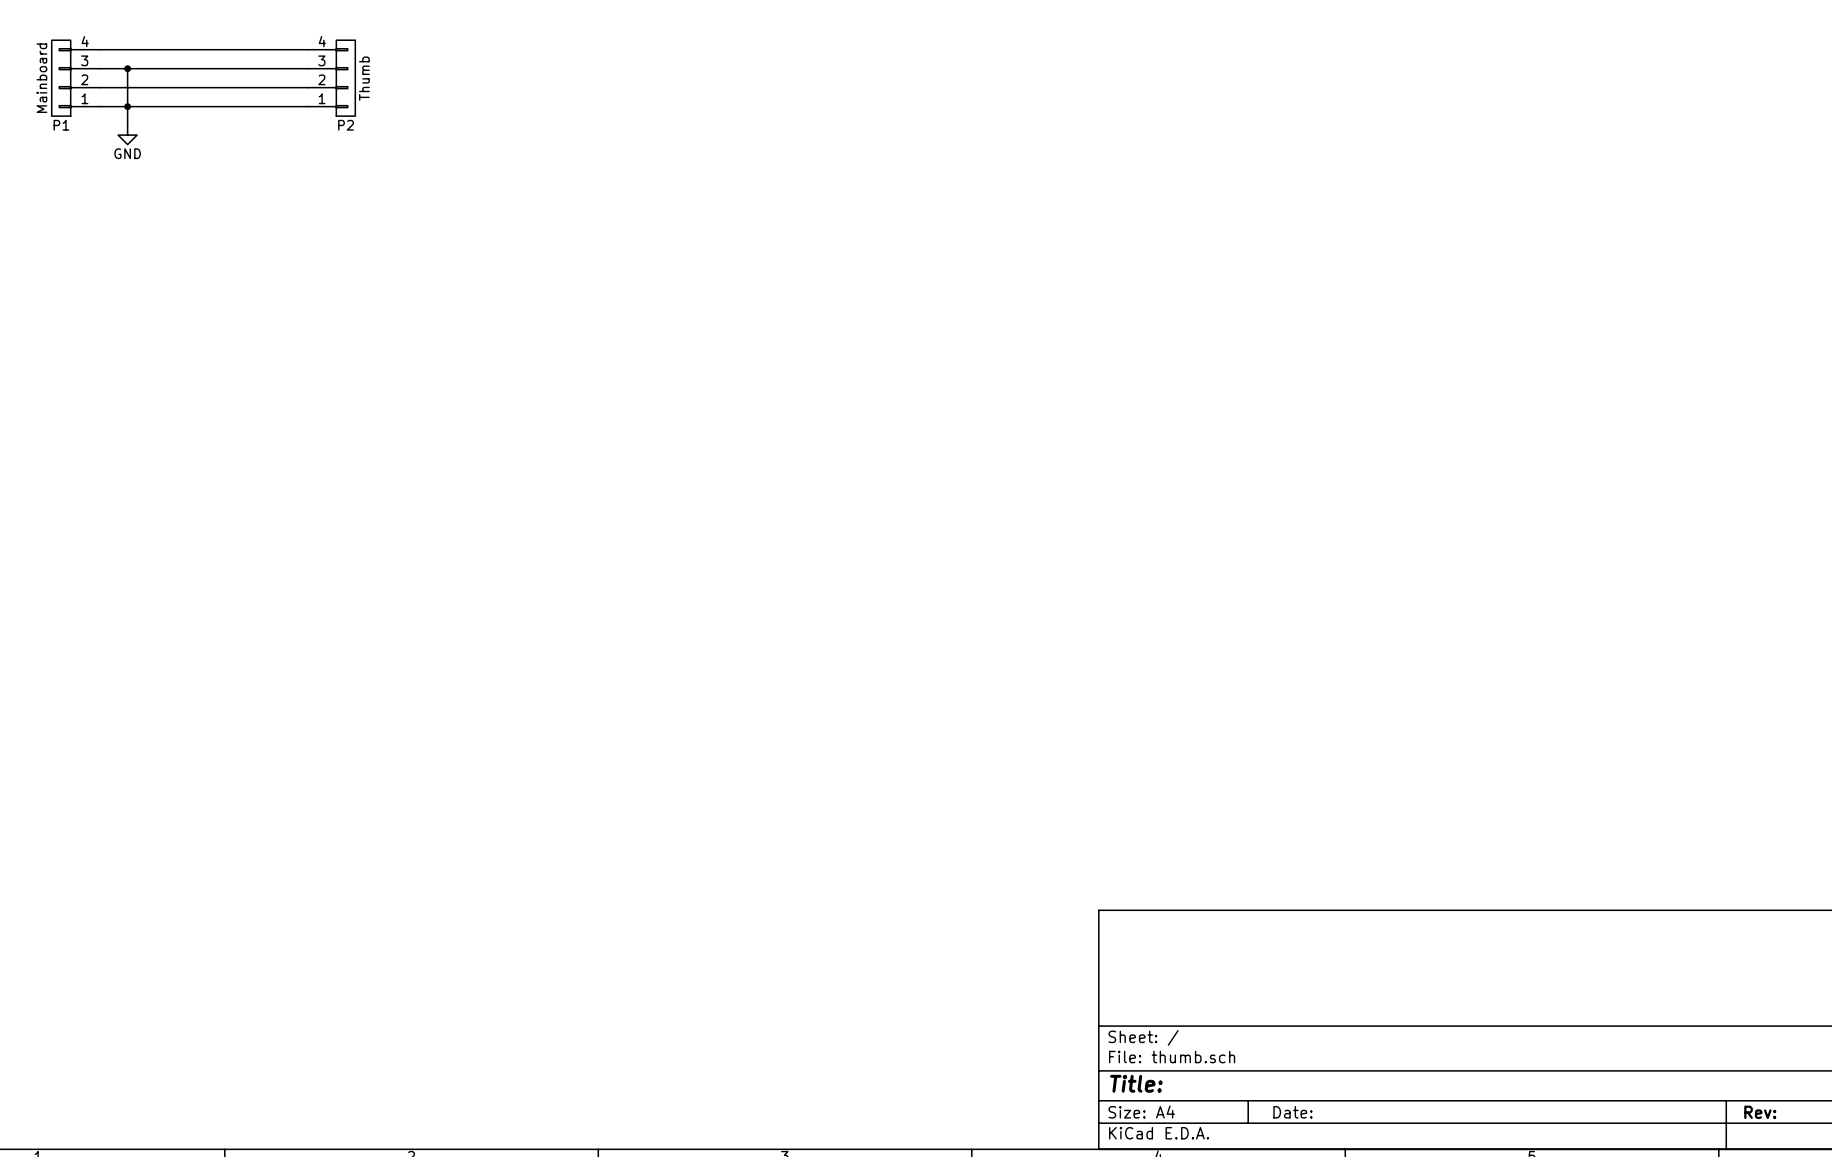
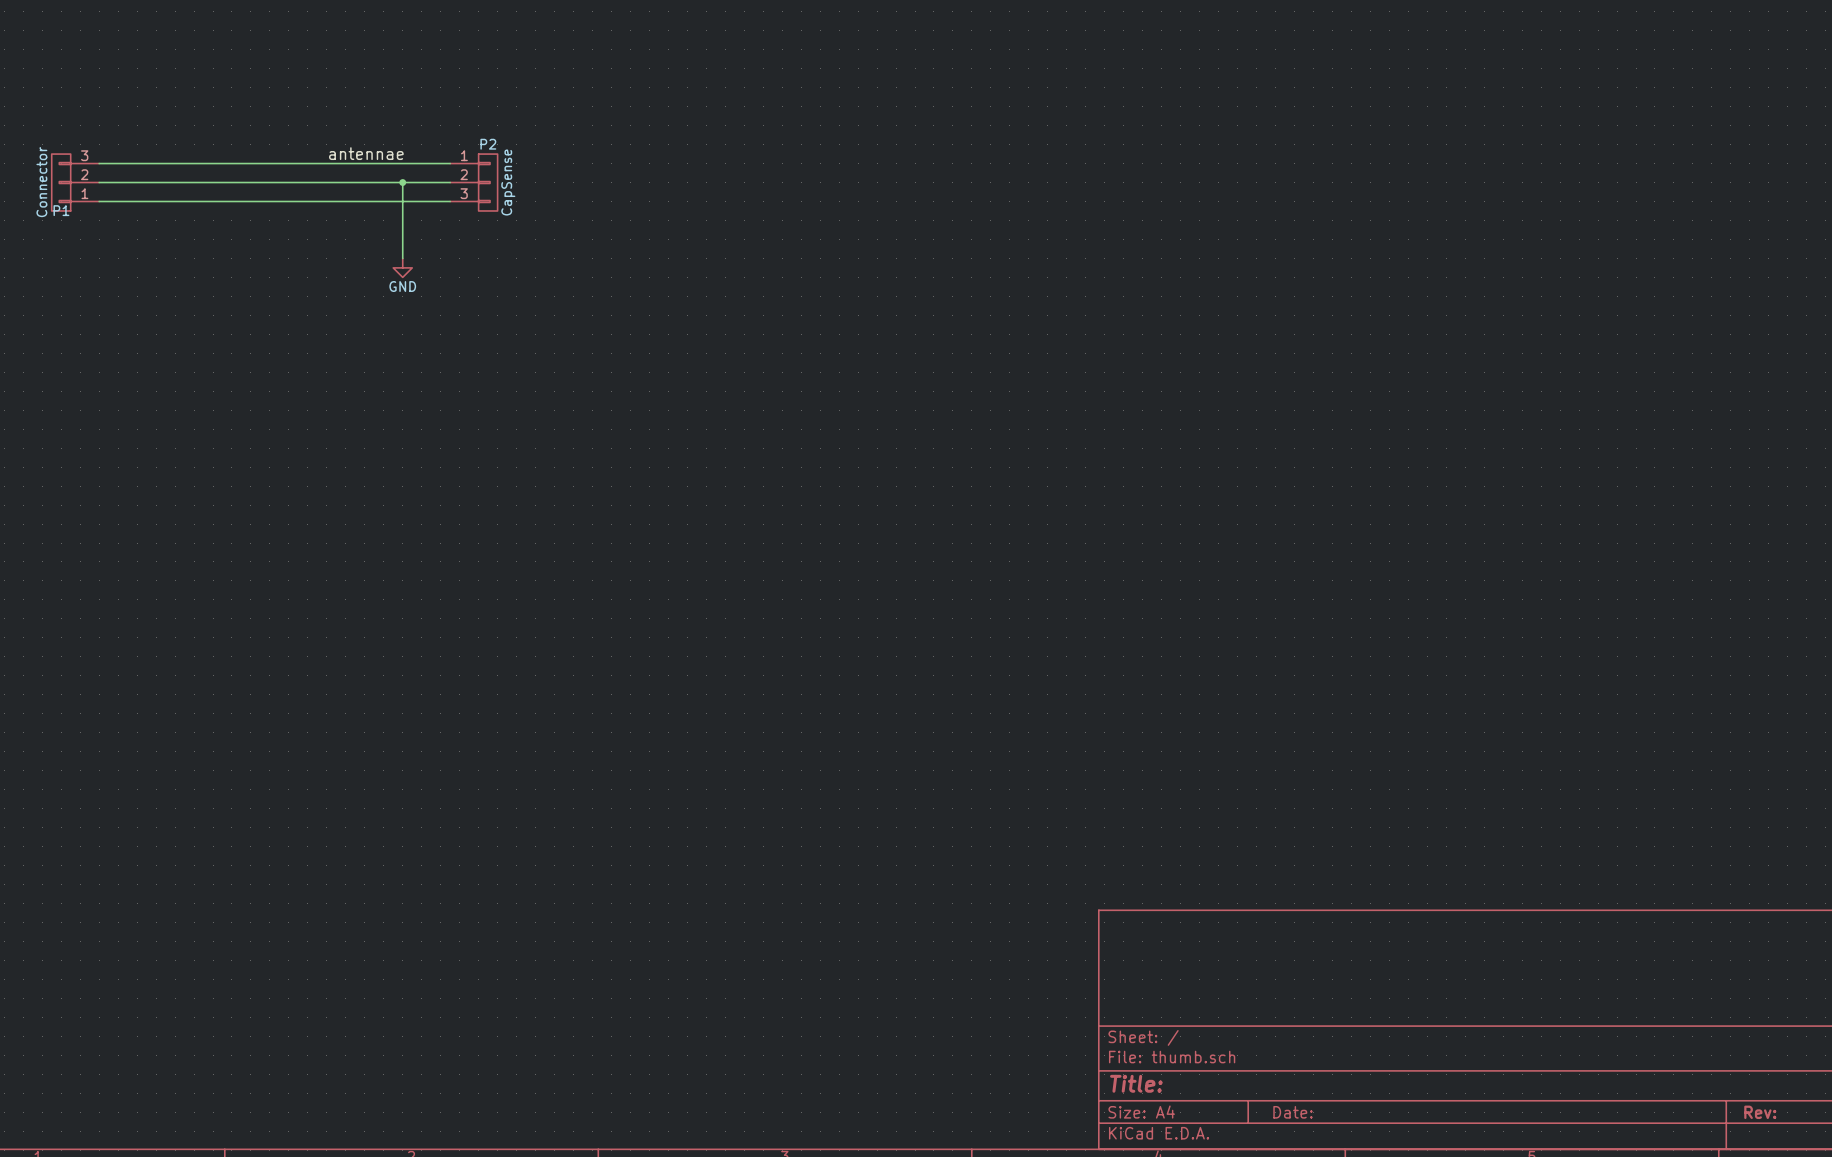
P1 symbol: [51, 40, 100, 117] -> [51, 154, 100, 211]
P2 symbol: [307, 40, 356, 117] -> [450, 154, 498, 211]
wire: (99, 49) (307, 49) -> none
wire: (99, 68) (307, 68) -> none
wire: (127, 68) (127, 125) -> none
junction: (127, 68) -> none
P1 value: Mainboard (41, 78) -> Connector (41, 182)
P2 value: Thumb (364, 78) -> CapSense (508, 182)
wire: (99, 87) (307, 87) -> none
wire: (99, 106) (307, 106) -> none
junction: (127, 106) -> none
P1 name position: P1 (61, 125) -> P1 (61, 210)
P2 name position: P2 (346, 125) -> P2 (488, 144)
power symbol: GND (127, 135) -> none
label: none -> antennae (366, 153)
wire: none -> (99, 163) (450, 163)
wire: none -> (99, 182) (450, 182)
wire: none -> (402, 182) (402, 258)
junction: none -> (402, 182)
wire: none -> (99, 201) (450, 201)
power symbol: none -> GND (402, 267)

